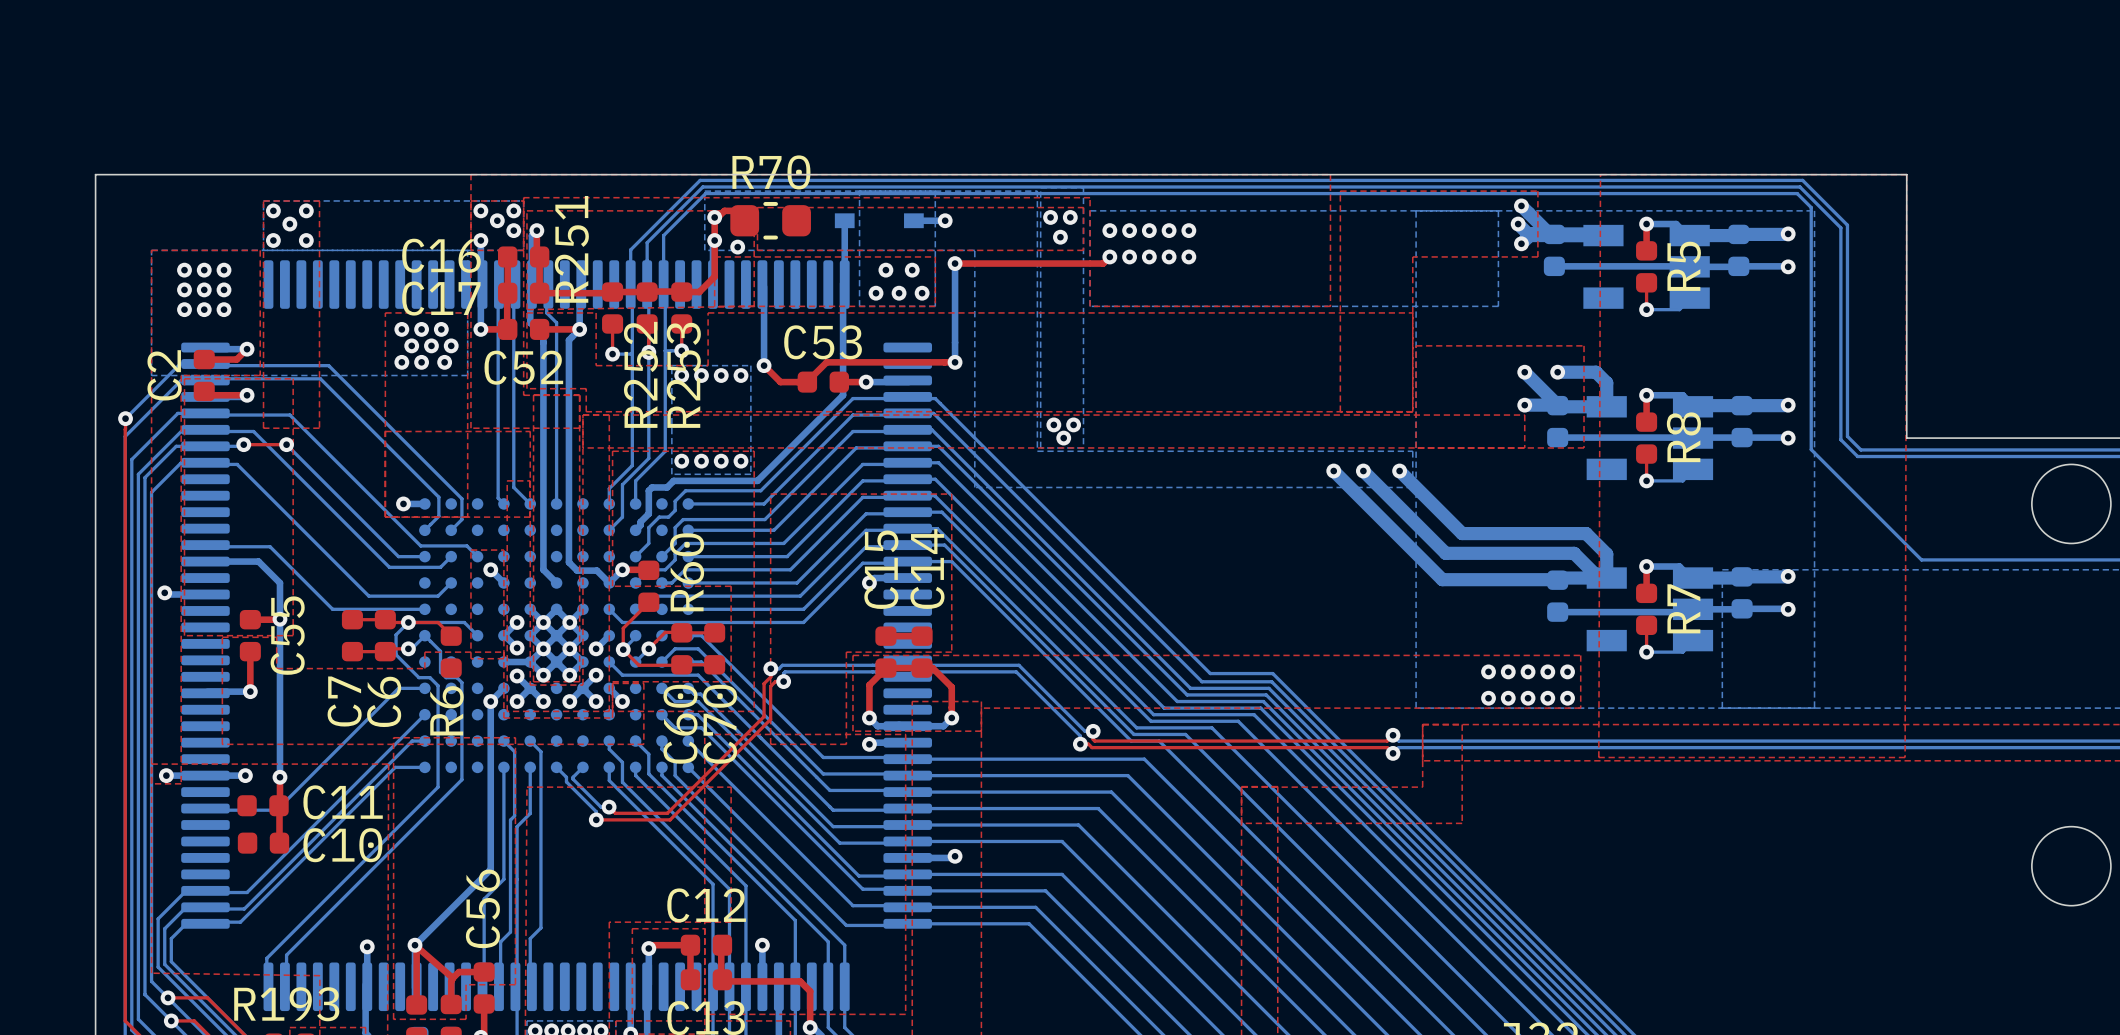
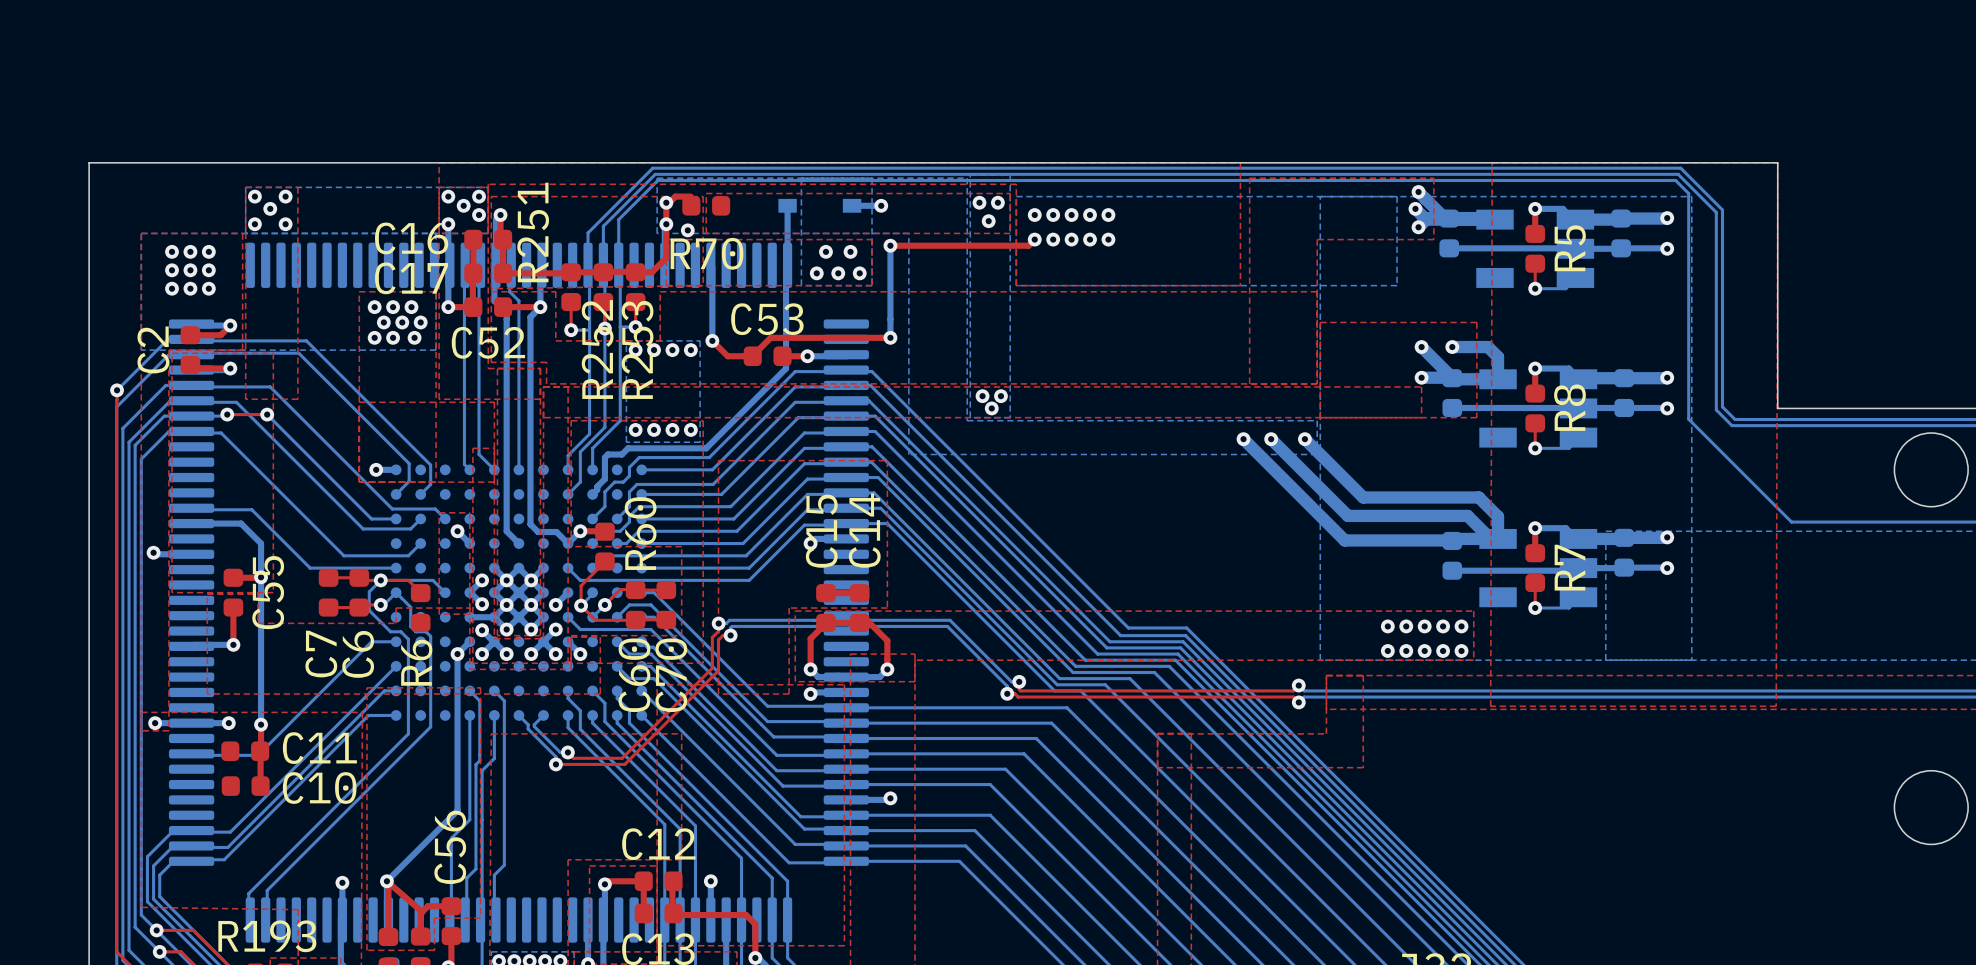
R70 name position: R70 (771, 172) -> R70 (706, 253)
R70 footprint: [730, 201, 811, 240] -> [682, 195, 731, 216]

